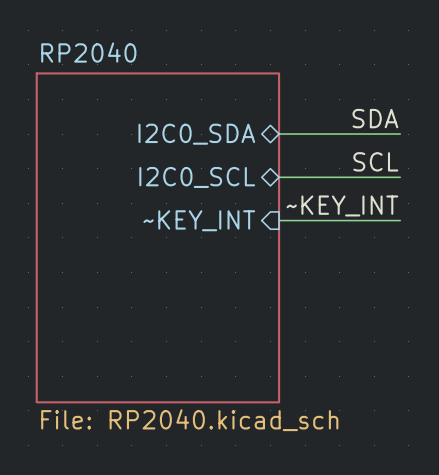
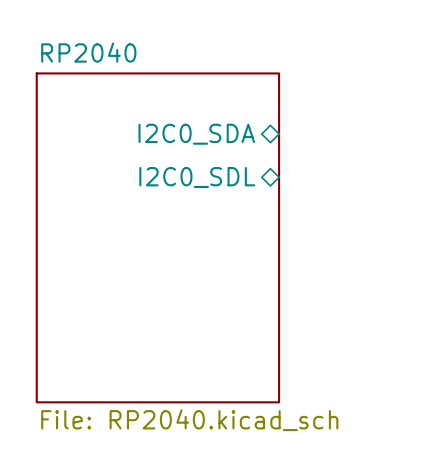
label: SDA (375, 118) -> none
wire: (279, 134) (400, 134) -> none
label: SCL (375, 161) -> none
sheet pin: I2C0_SCL (197, 177) -> I2C0_SDL (197, 177)
wire: (279, 177) (400, 177) -> none
label: ~KEY_INT (342, 205) -> none
sheet pin: ~KEY_INT (199, 220) -> none
wire: (279, 220) (400, 220) -> none

